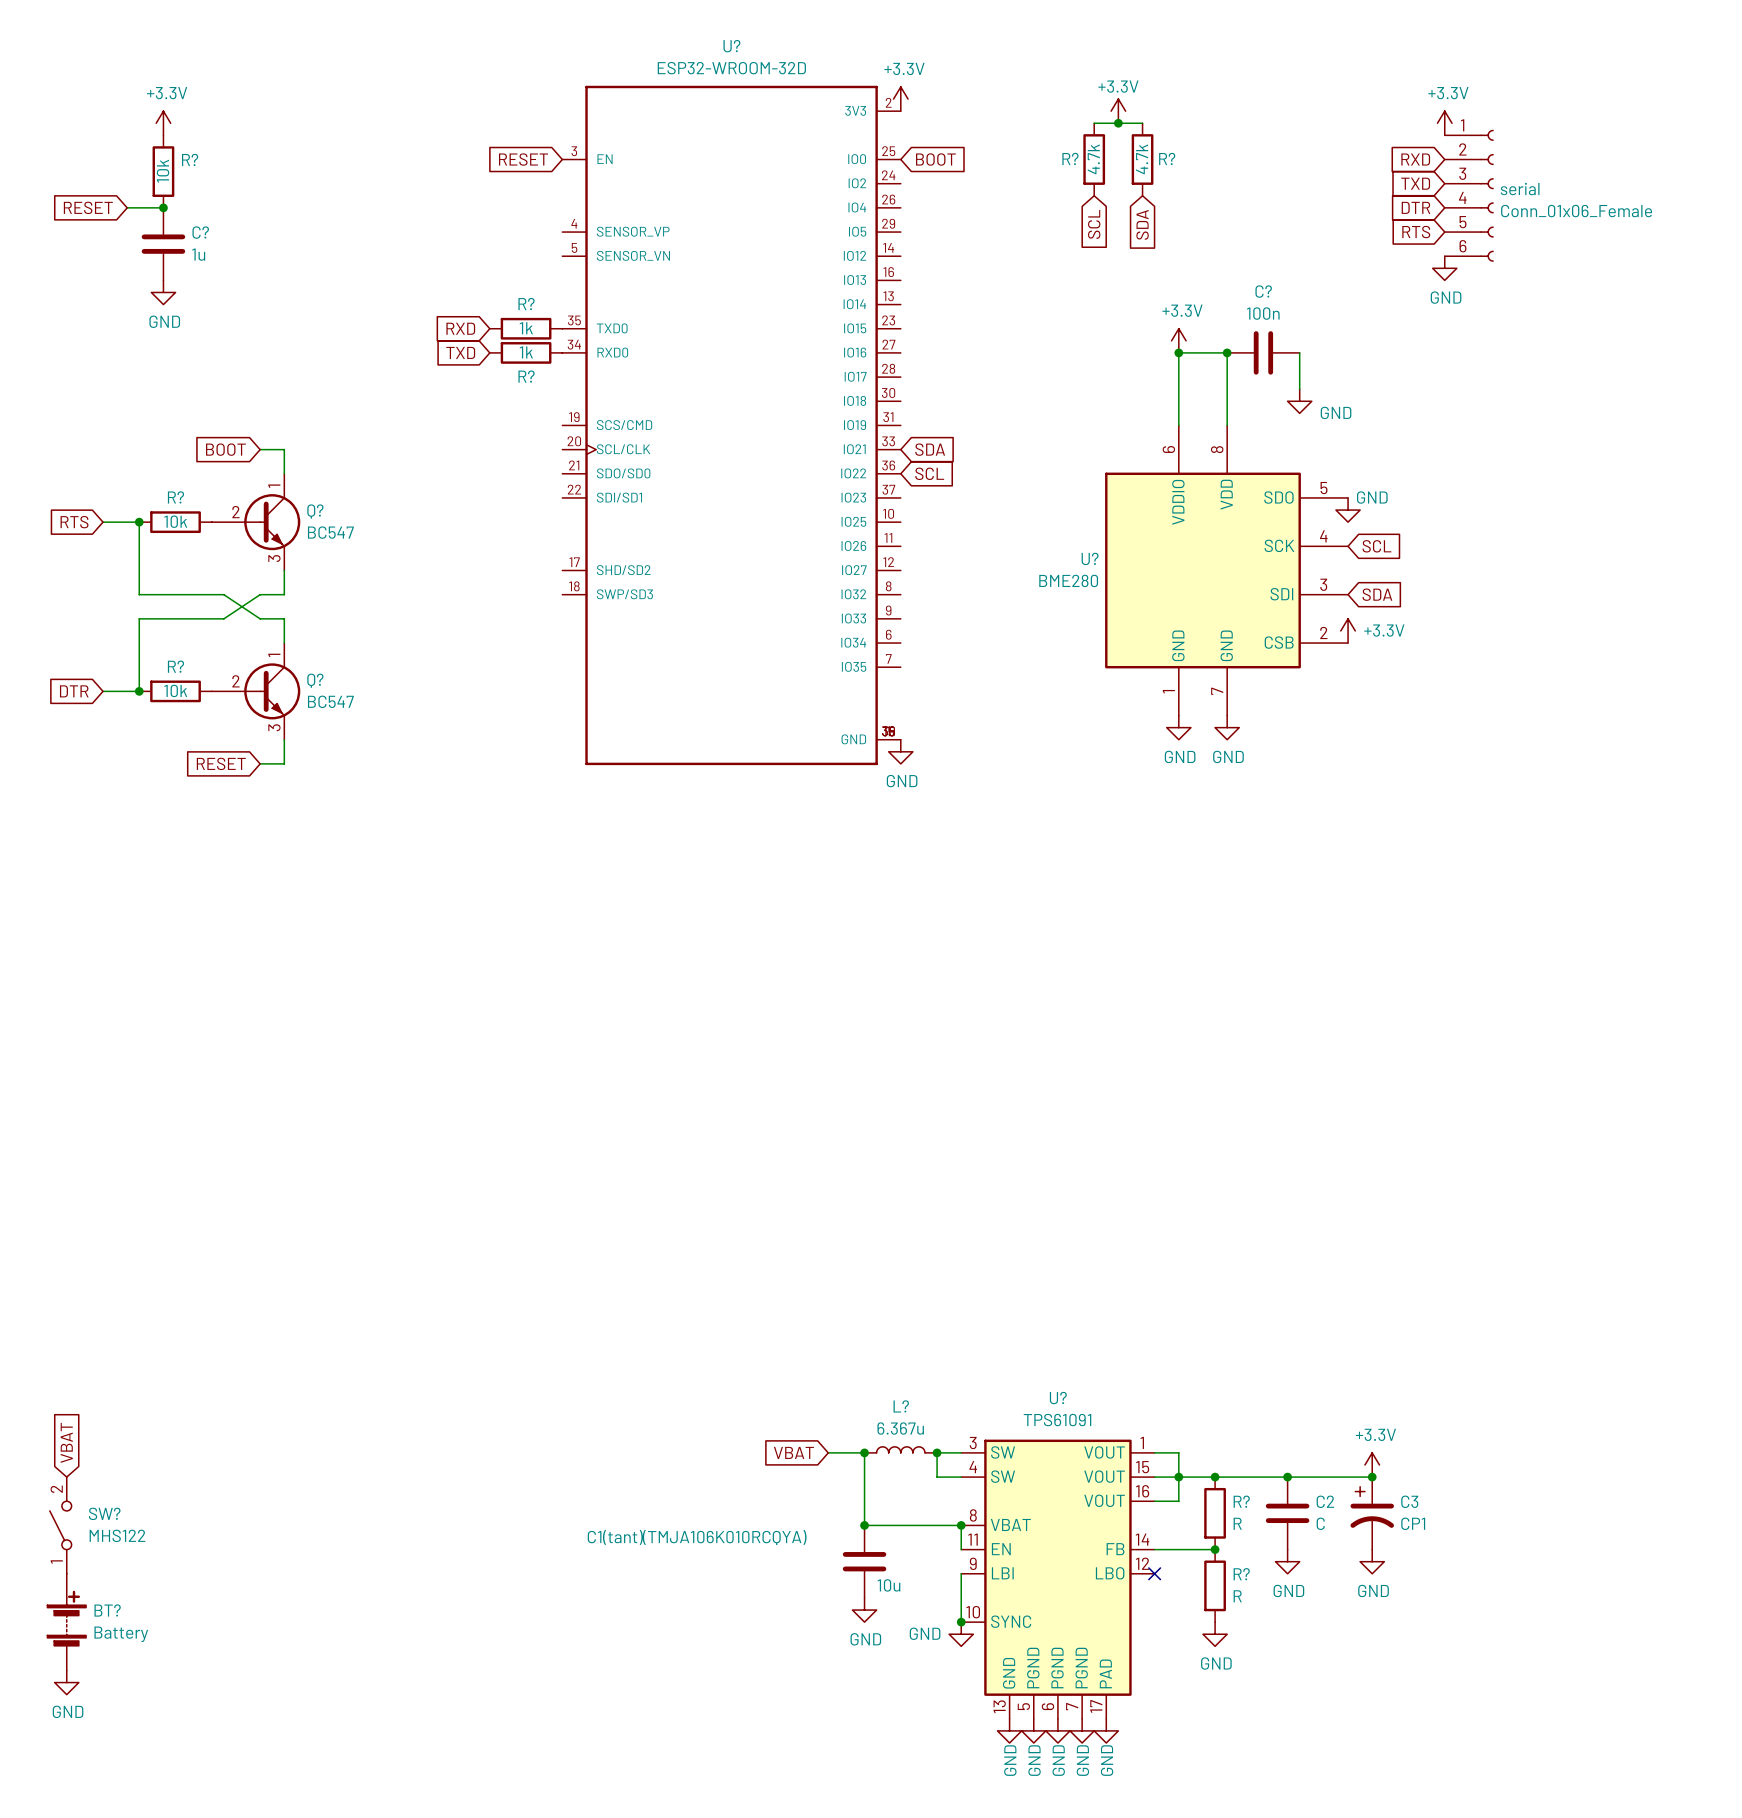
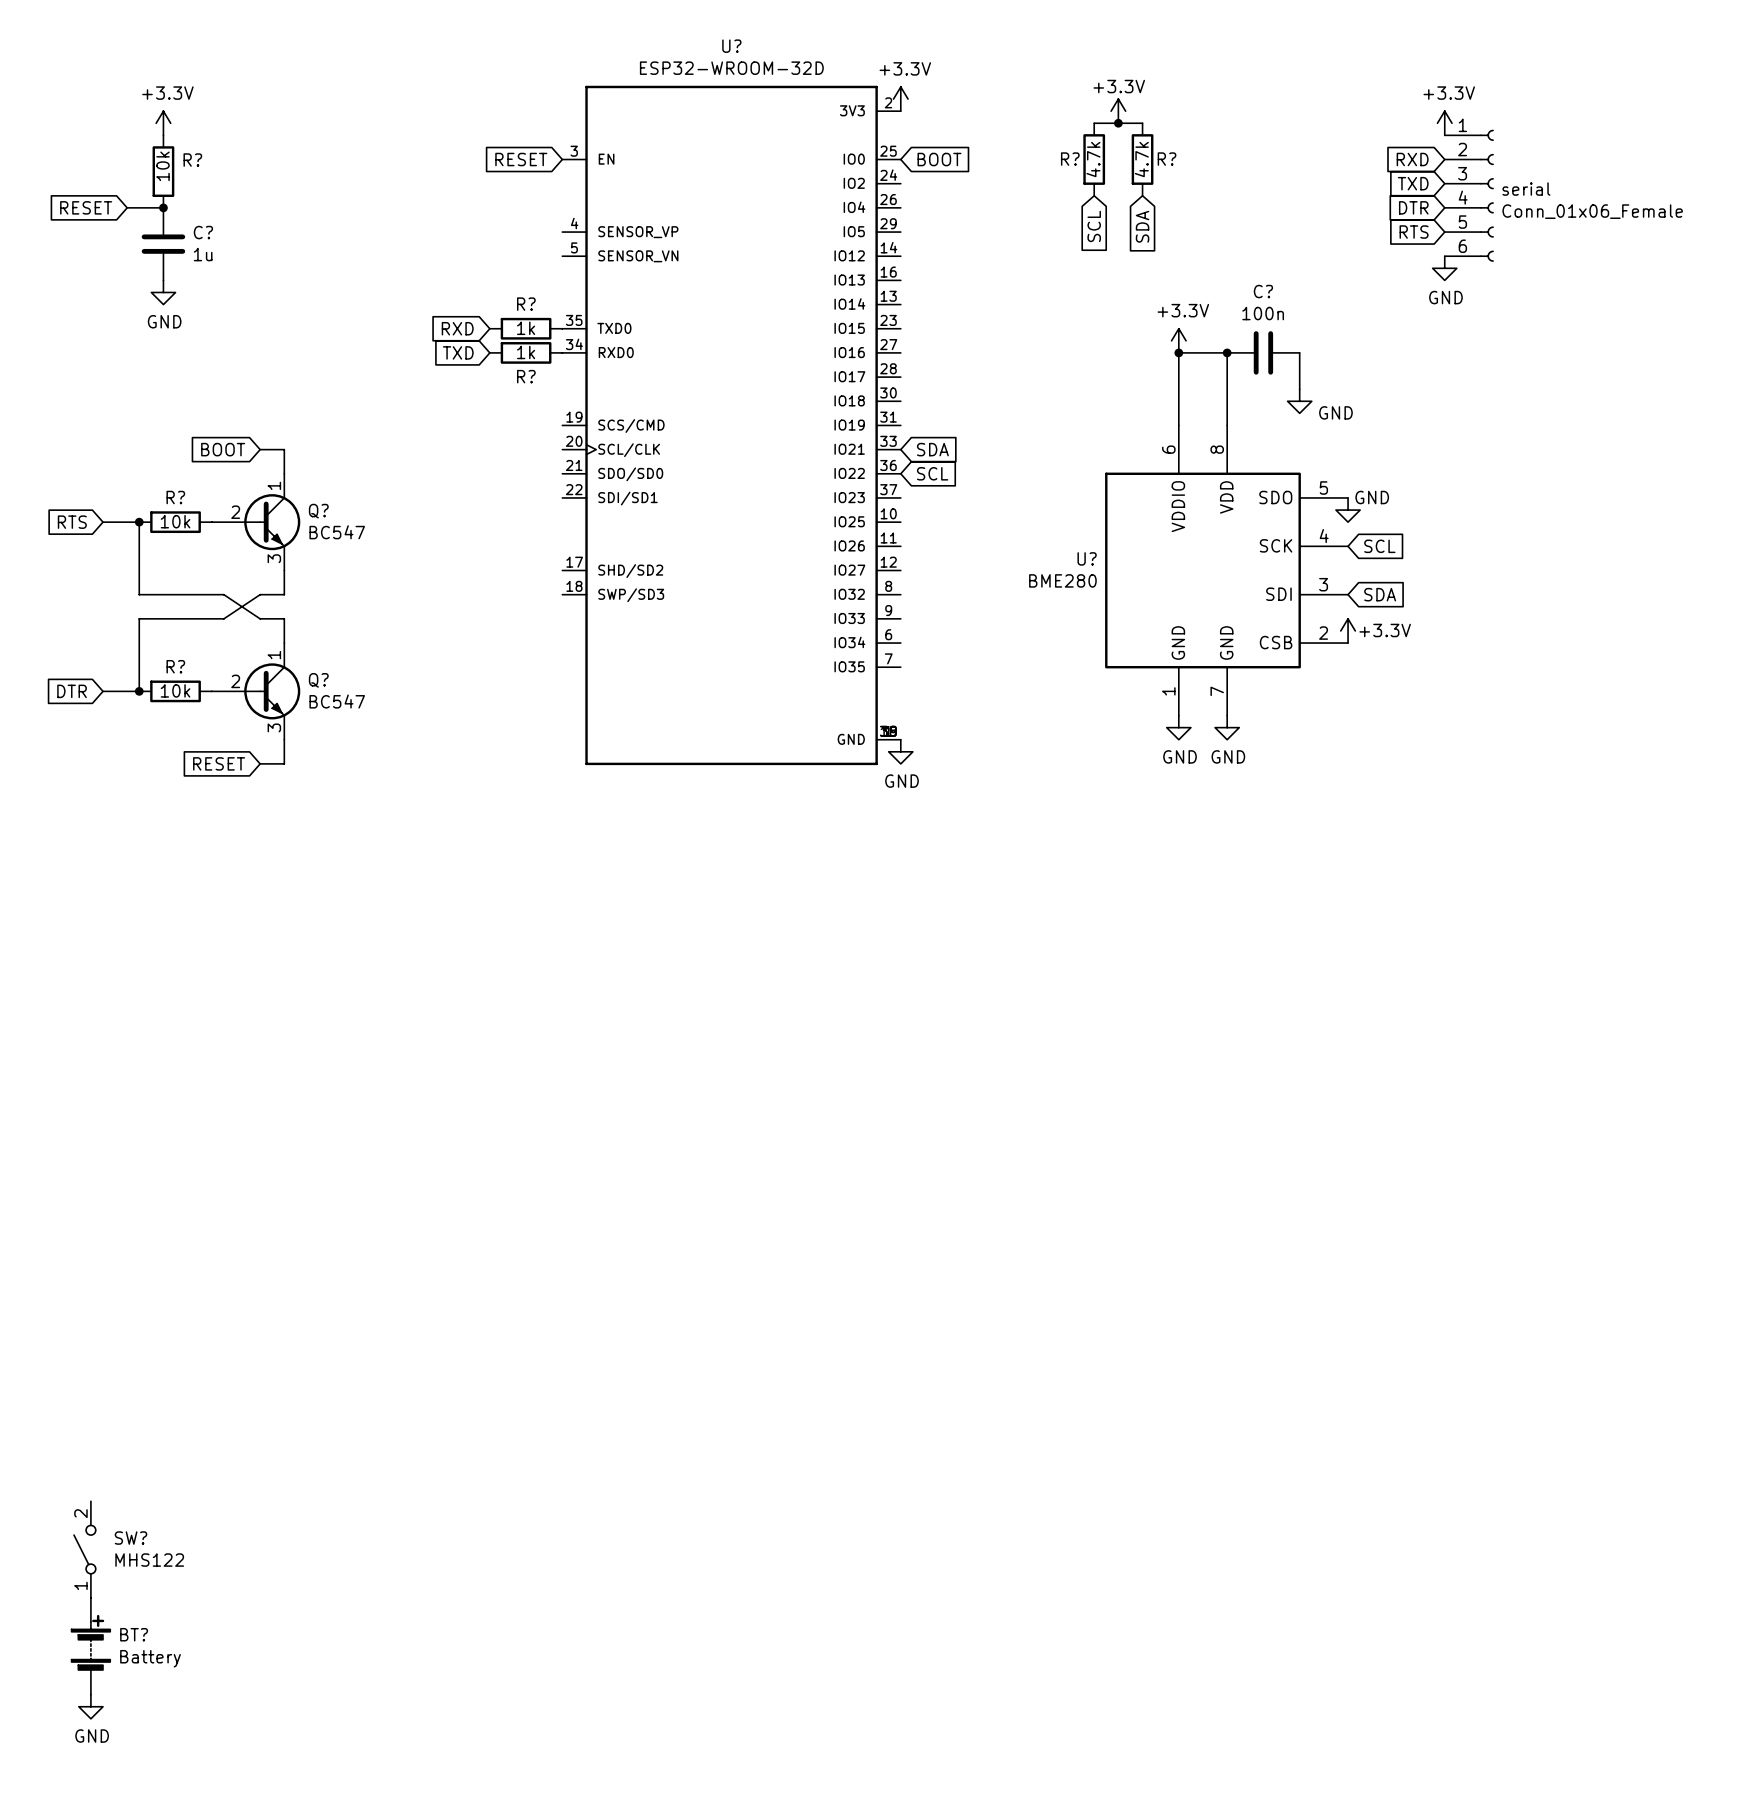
global label: VBAT (66, 1442) -> none
L?: 6.367u (900, 1449) -> none
global label: VBAT (793, 1452) -> none
wire: (828, 1452) (864, 1452) (864, 1525) (961, 1525) (961, 1549) -> none
junction: (864, 1452) -> none
junction: (937, 1452) -> none
wire: (961, 1452) (937, 1452) (937, 1477) (961, 1477) -> none
wire: (1154, 1452) (1178, 1452) (1178, 1501) (1154, 1501) -> none
power symbol: +3.3V (1372, 1464) -> none
wire: (1154, 1477) (1372, 1477) -> none
junction: (1178, 1477) -> none
junction: (1215, 1477) -> none
junction: (1287, 1477) -> none
junction: (1372, 1477) -> none
R?: R (1215, 1513) -> none
C2: C (1287, 1513) -> none
C3: CP1 (1372, 1513) -> none
SW? position: (60, 1525) -> (84, 1549)
junction: (864, 1525) -> none
junction: (961, 1525) -> none
wire: (1154, 1549) (1215, 1549) -> none
junction: (1215, 1549) -> none
C1(tant)(TMJA106K010RCQYA): 10u (864, 1561) -> none
power symbol: GND (1287, 1561) -> none
power symbol: GND (1372, 1561) -> none
wire: (961, 1573) (961, 1622) -> none
no-connect mark: (1154, 1573) -> none
U?: TPS61091 (1057, 1579) -> none
R?: R (1215, 1585) -> none
power symbol: GND (864, 1610) -> none
BT? position: (66, 1622) -> (90, 1646)
junction: (961, 1622) -> none
power symbol: GND (961, 1634) -> none
power symbol: GND (1215, 1634) -> none
power symbol position: GND (66, 1682) -> GND (90, 1706)
power symbol: GND (1009, 1730) -> none
power symbol: GND (1033, 1730) -> none
power symbol: GND (1057, 1730) -> none
power symbol: GND (1082, 1730) -> none
power symbol: GND (1106, 1730) -> none

